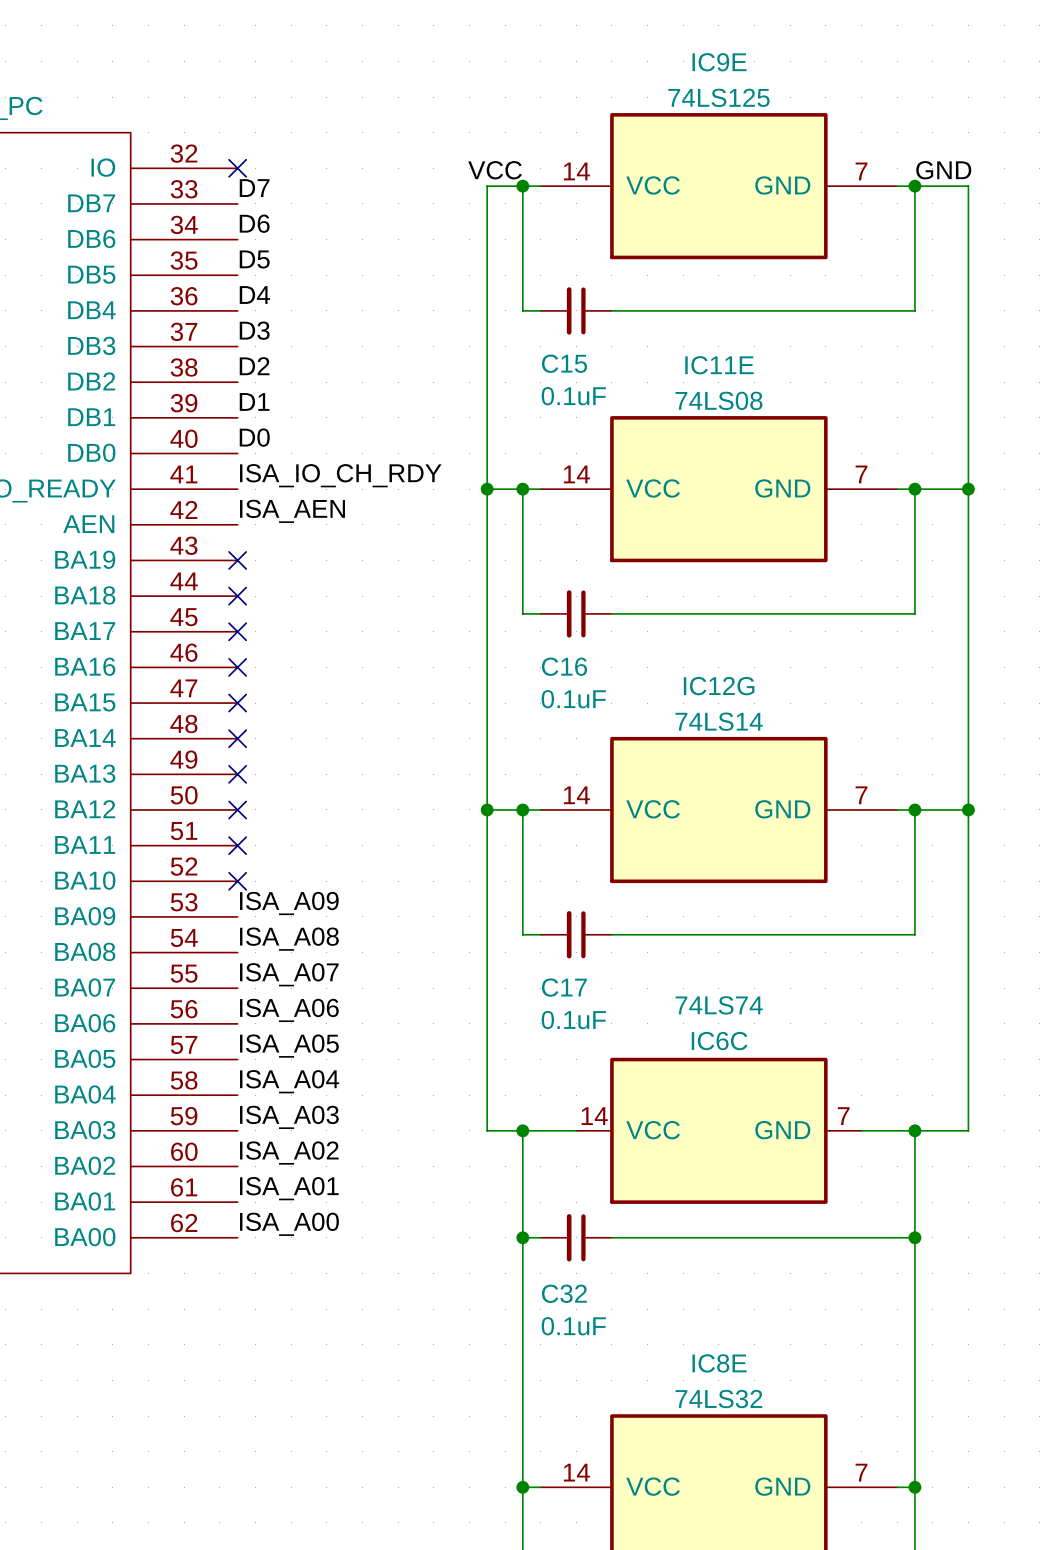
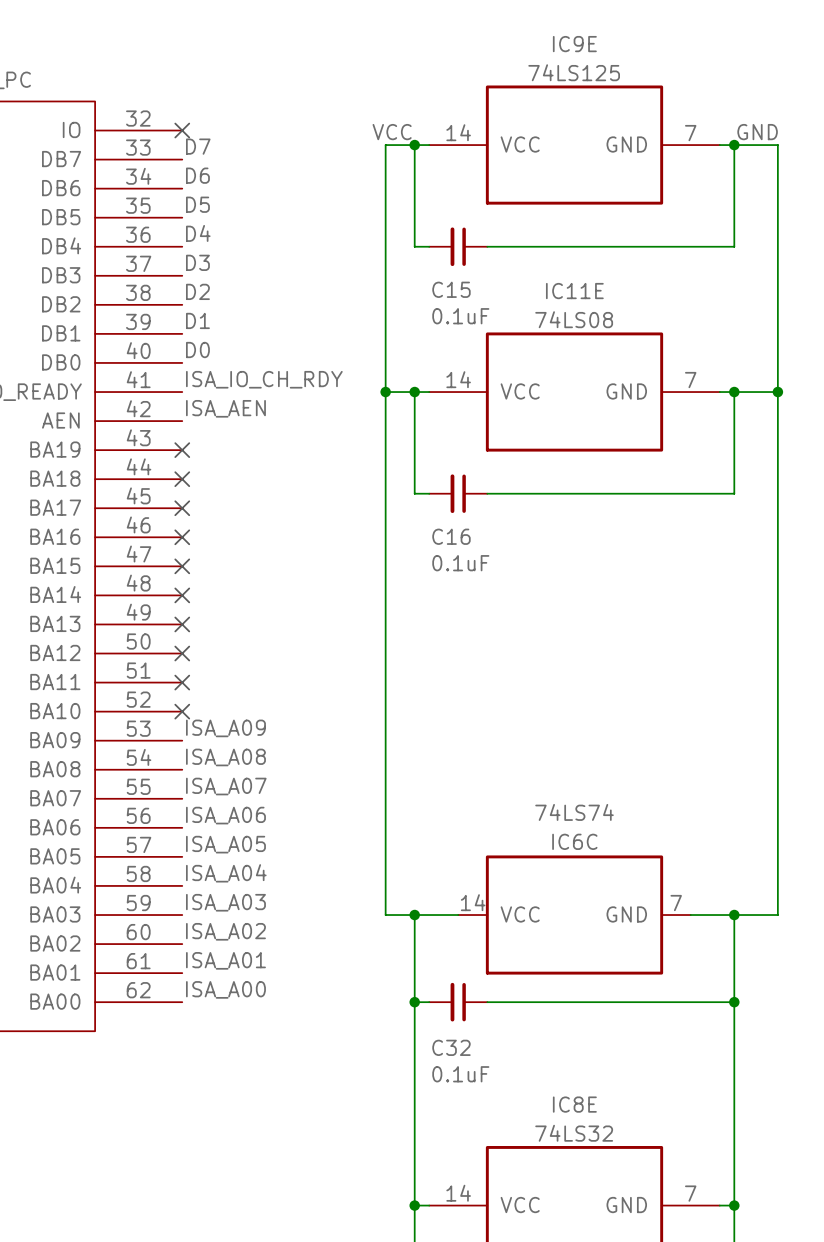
wire: (487, 809) (540, 809) -> none
junction: (487, 809) -> none
wire: (522, 809) (522, 934) (540, 934) -> none
junction: (522, 809) -> none
IC12G: 74LS14 (718, 809) -> none
wire: (897, 809) (968, 809) -> none
wire: (914, 809) (914, 934) (611, 934) -> none
junction: (914, 809) -> none
junction: (968, 809) -> none
C17: 0.1uF (576, 934) -> none

